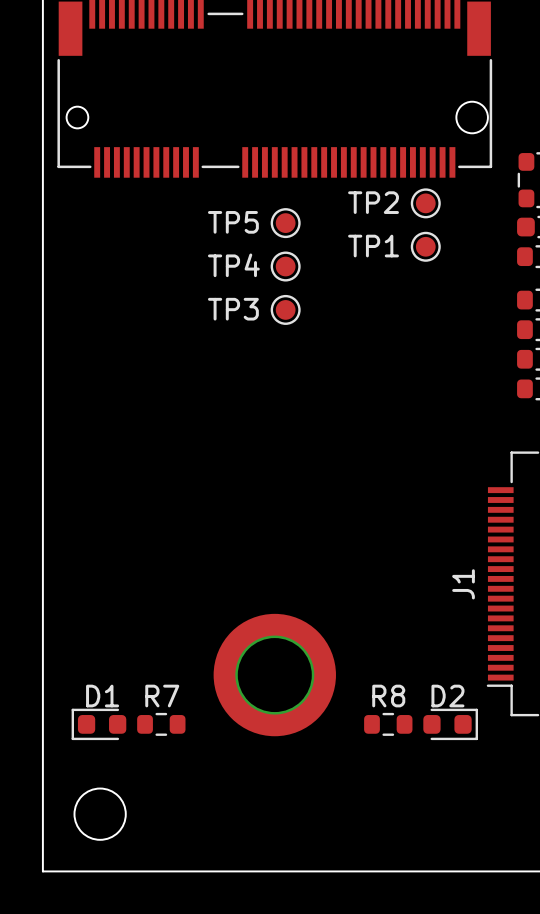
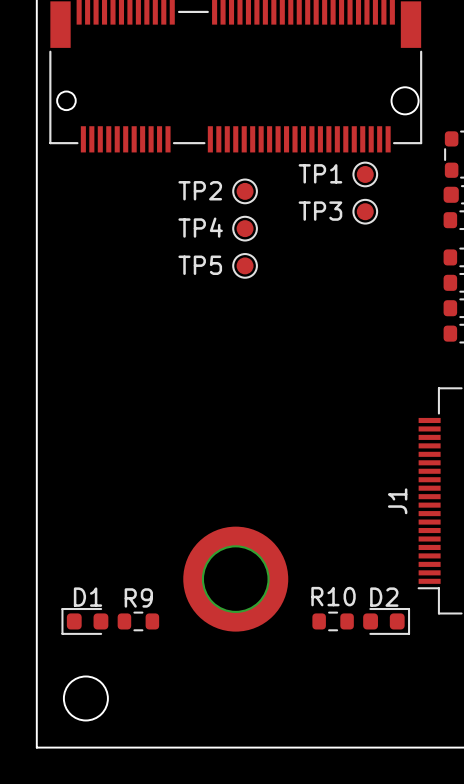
TP2 name: TP2 (373, 202) -> TP1 (320, 173)
TP5 name: TP5 (233, 222) -> TP2 (200, 190)
TP1 name: TP1 (373, 246) -> TP3 (320, 211)
TP3 name: TP3 (233, 309) -> TP5 (200, 265)
R7 name: R7 (162, 696) -> R9 (138, 597)
R8 name: R8 (388, 696) -> R10 (333, 596)

